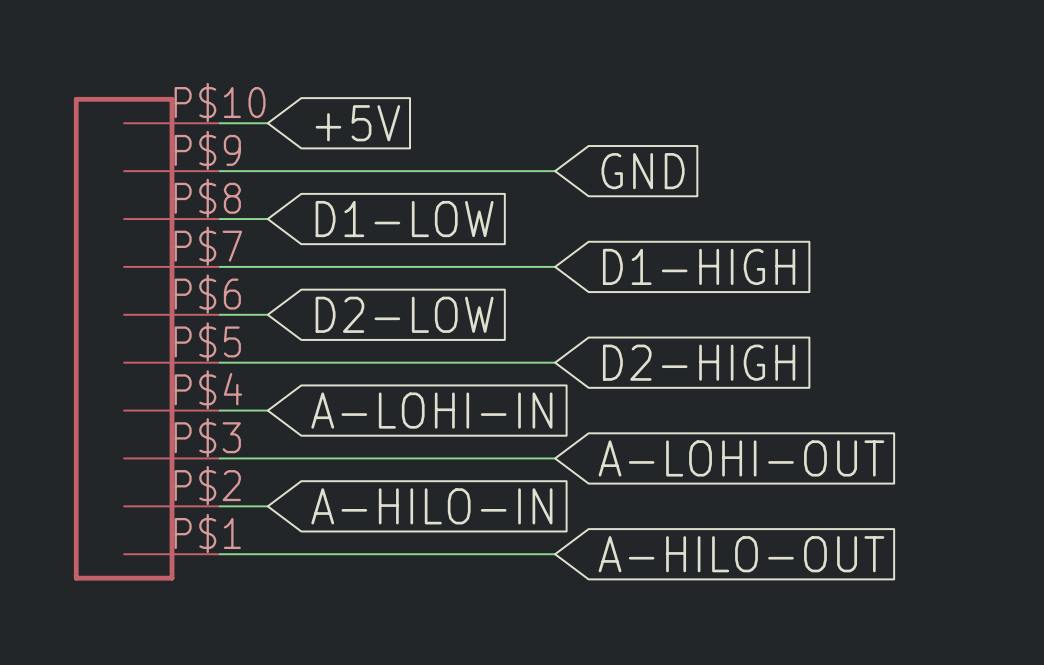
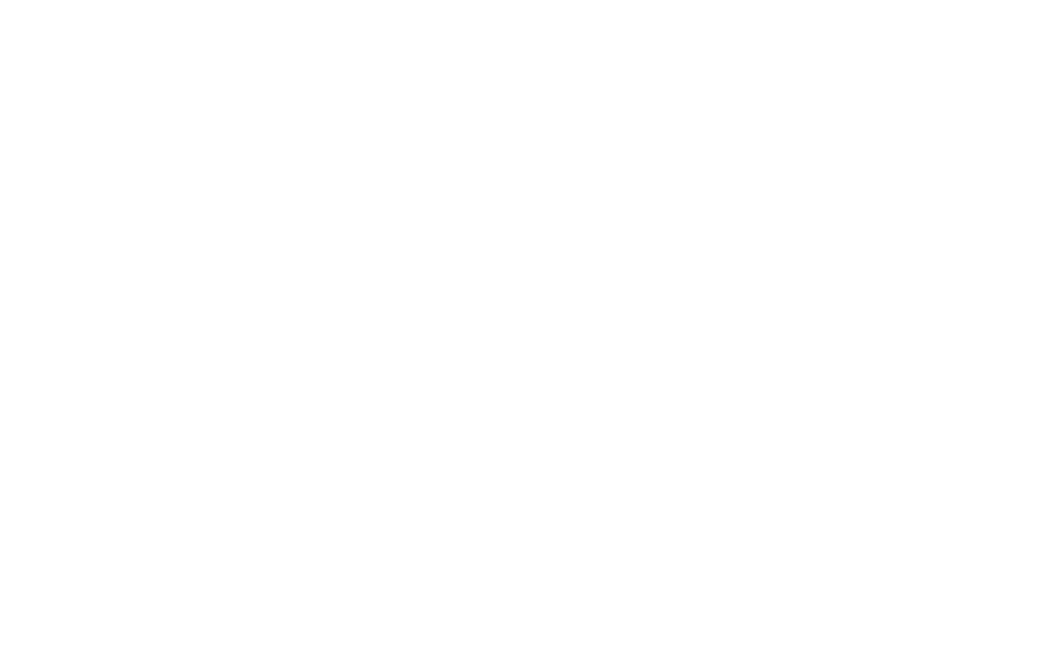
wire: (219, 123) (267, 123) -> none
global label: +5V (357, 123) -> none
wire: (219, 171) (555, 171) -> none
global label: GND (643, 171) -> none
wire: (219, 219) (267, 219) -> none
global label: D1-LOW (404, 219) -> none
wire: (219, 266) (555, 266) -> none
global label: D1-HIGH (699, 266) -> none
wire: (219, 314) (267, 314) -> none
global label: D2-LOW (404, 314) -> none
part: (146, 338) -> none
wire: (219, 362) (555, 362) -> none
global label: D2-HIGH (699, 362) -> none
wire: (219, 410) (267, 410) -> none
global label: A-LOHI-IN (431, 410) -> none
wire: (219, 458) (555, 458) -> none
global label: A-LOHI-OUT (741, 458) -> none
wire: (219, 506) (267, 506) -> none
global label: A-HILO-IN (431, 506) -> none
wire: (219, 554) (555, 554) -> none
global label: A-HILO-OUT (741, 554) -> none

